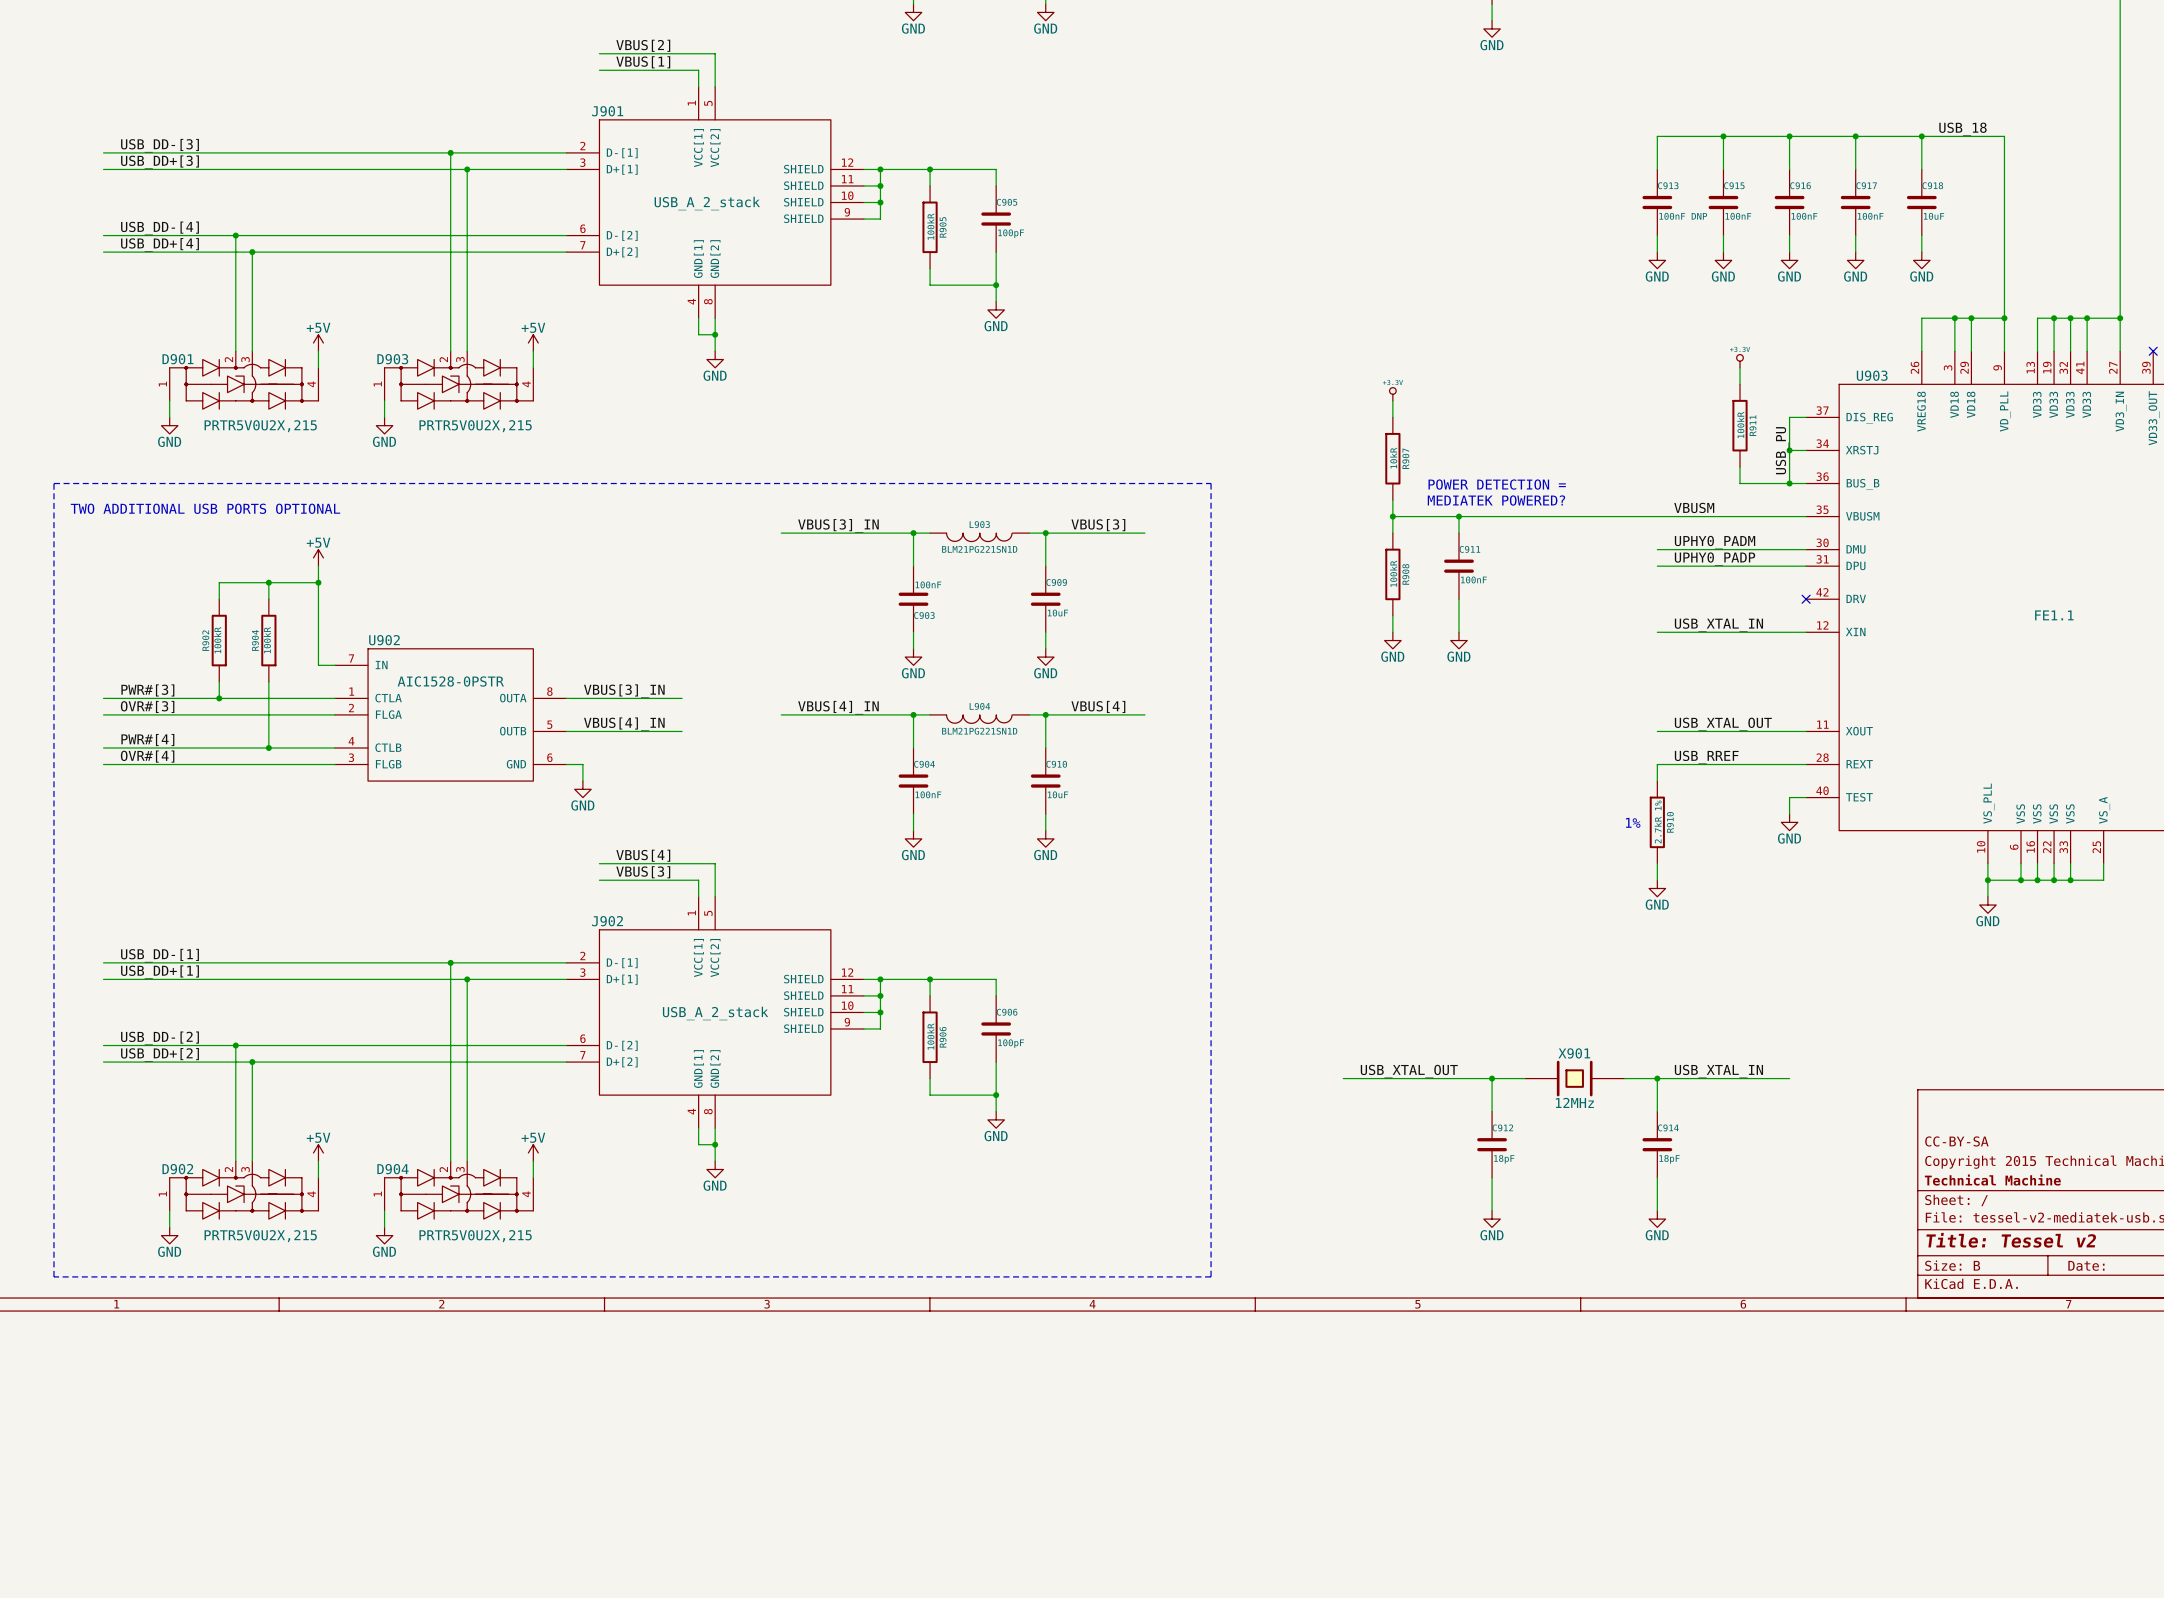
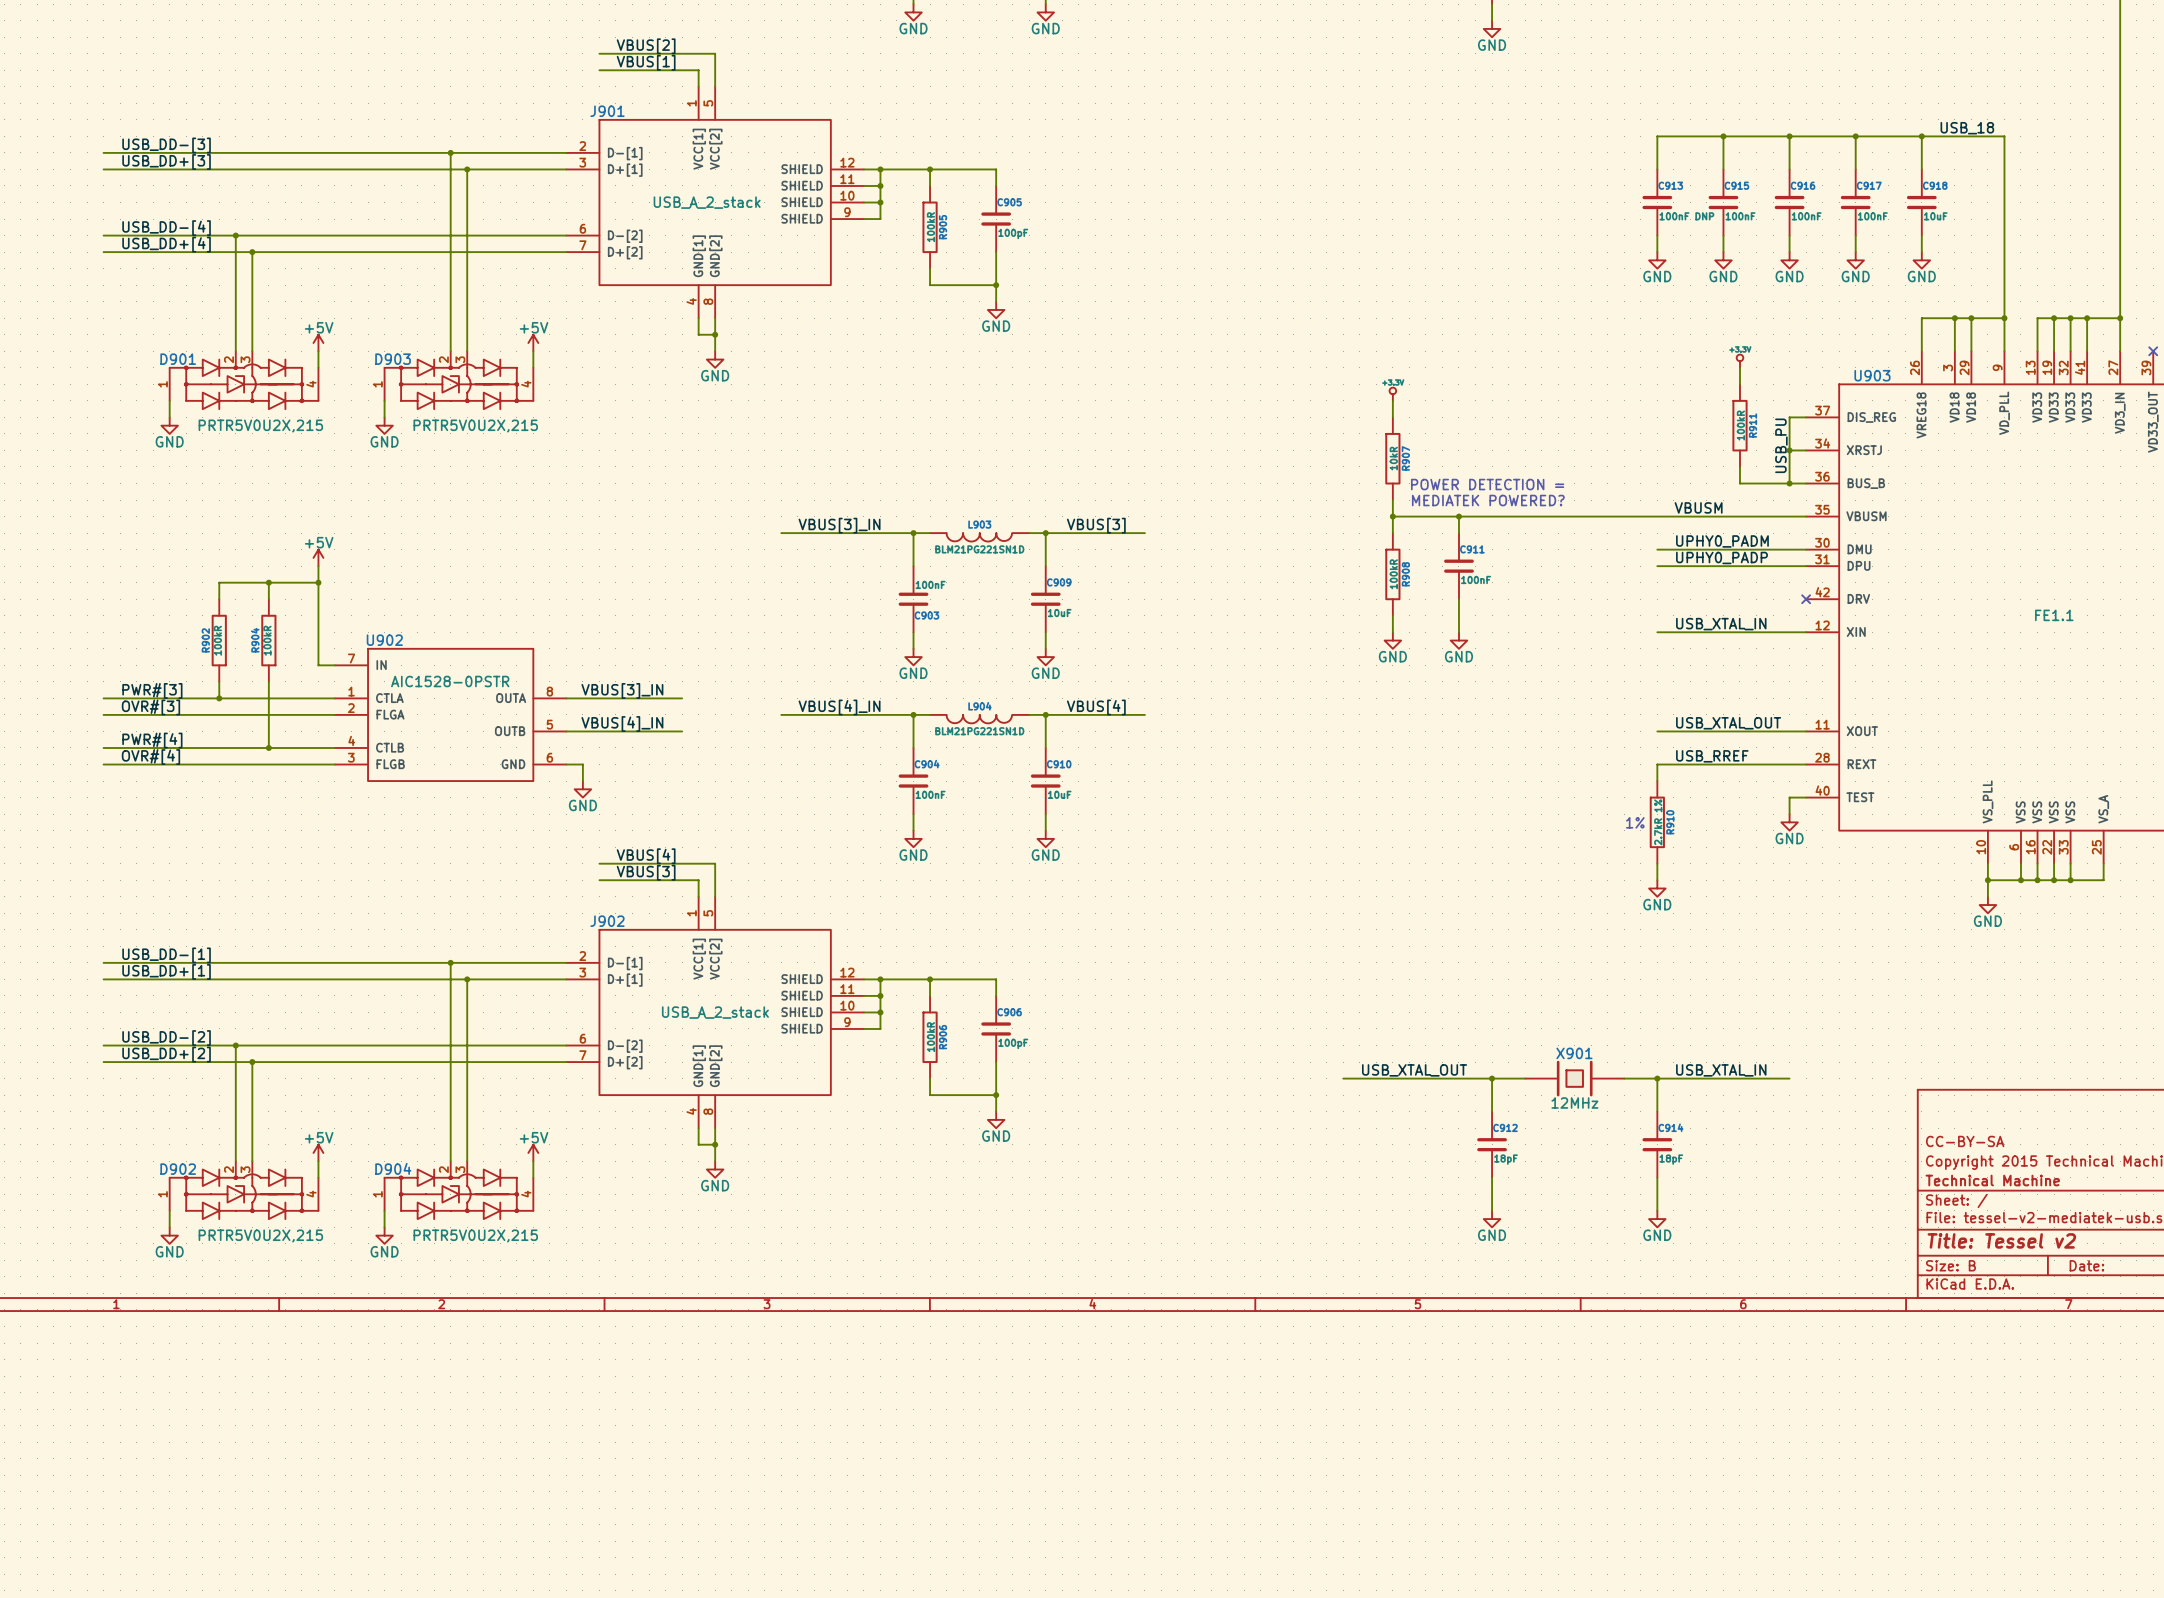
line: (53, 483) (53, 1276) (1211, 1276) (1211, 483) (53, 483) -> none
text: TWO ADDITIONAL USB PORTS OPTIONAL (205, 508) -> none

